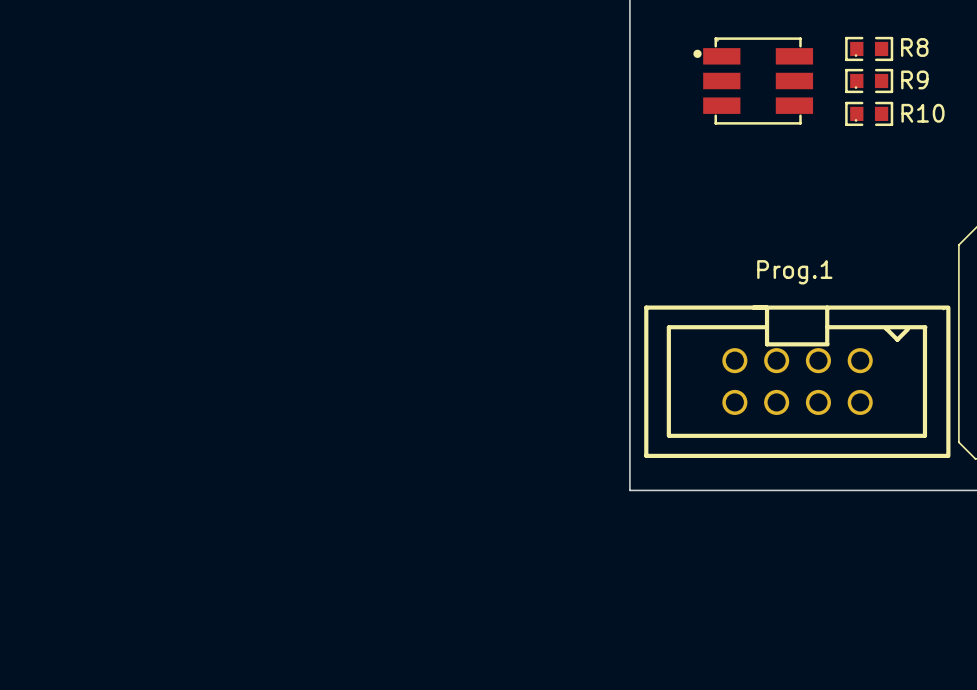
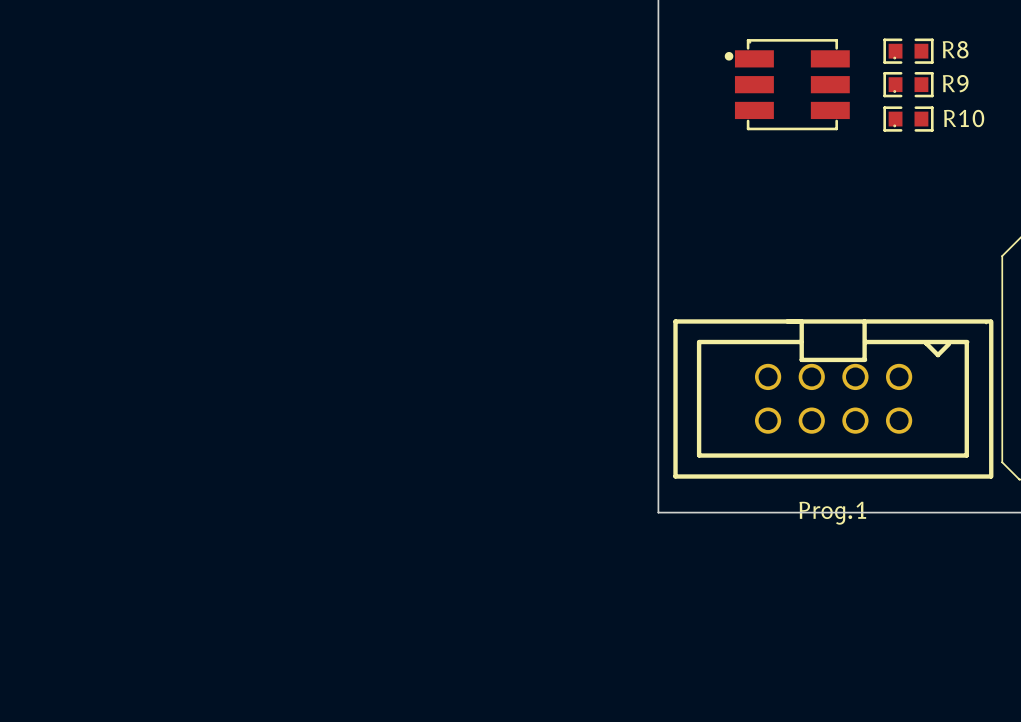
Prog.1 name position: Prog.1 (794, 272) -> Prog.1 (832, 513)

